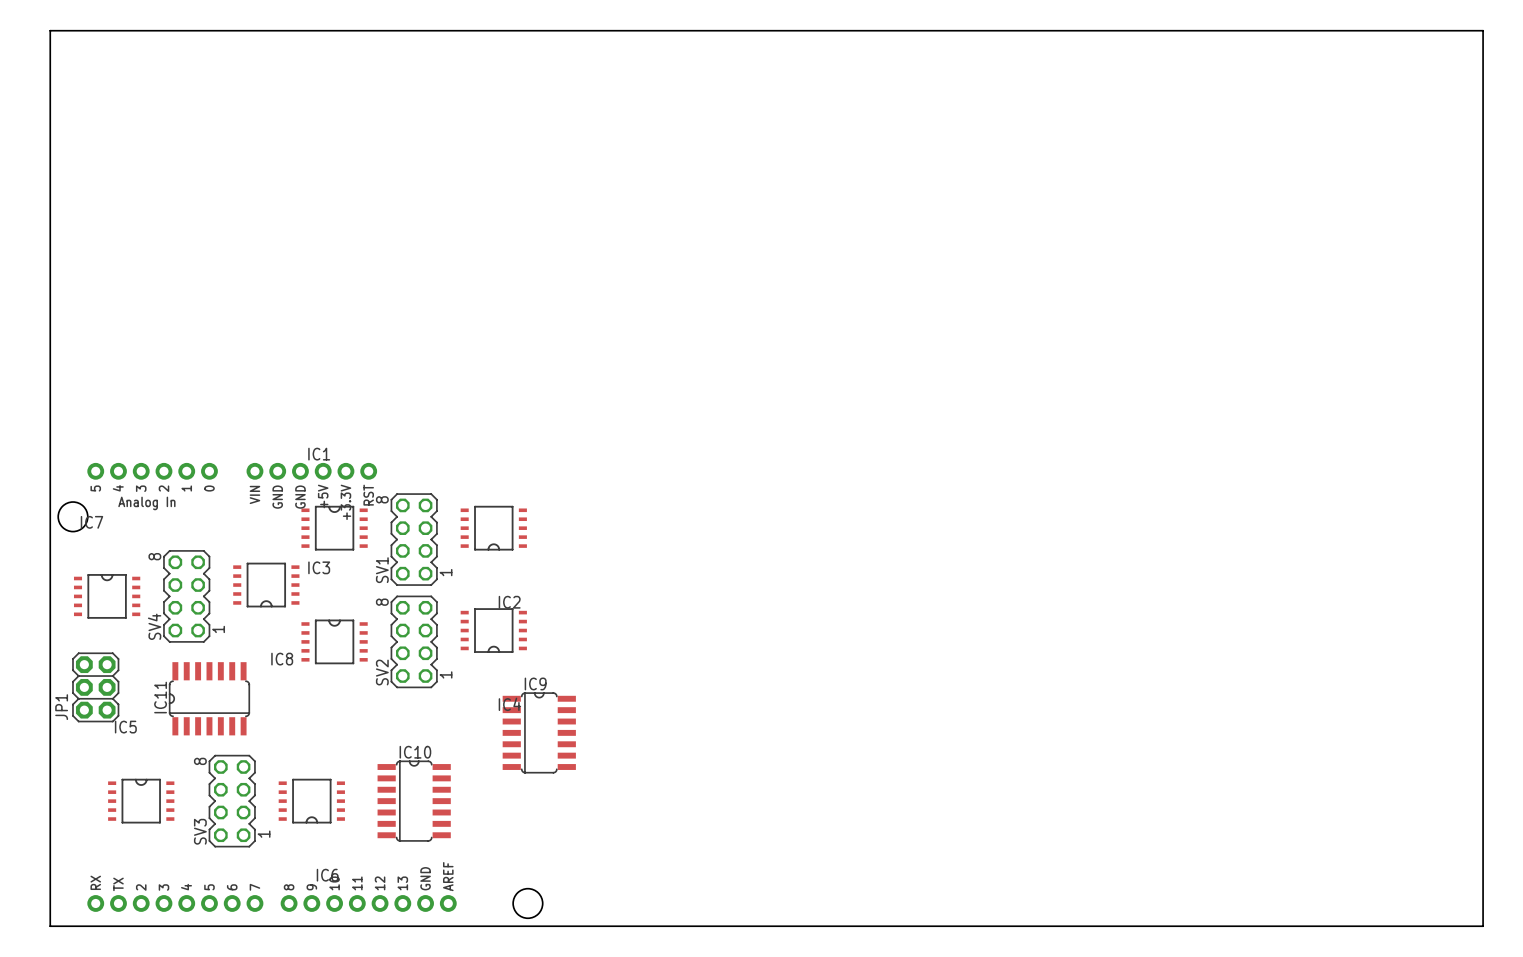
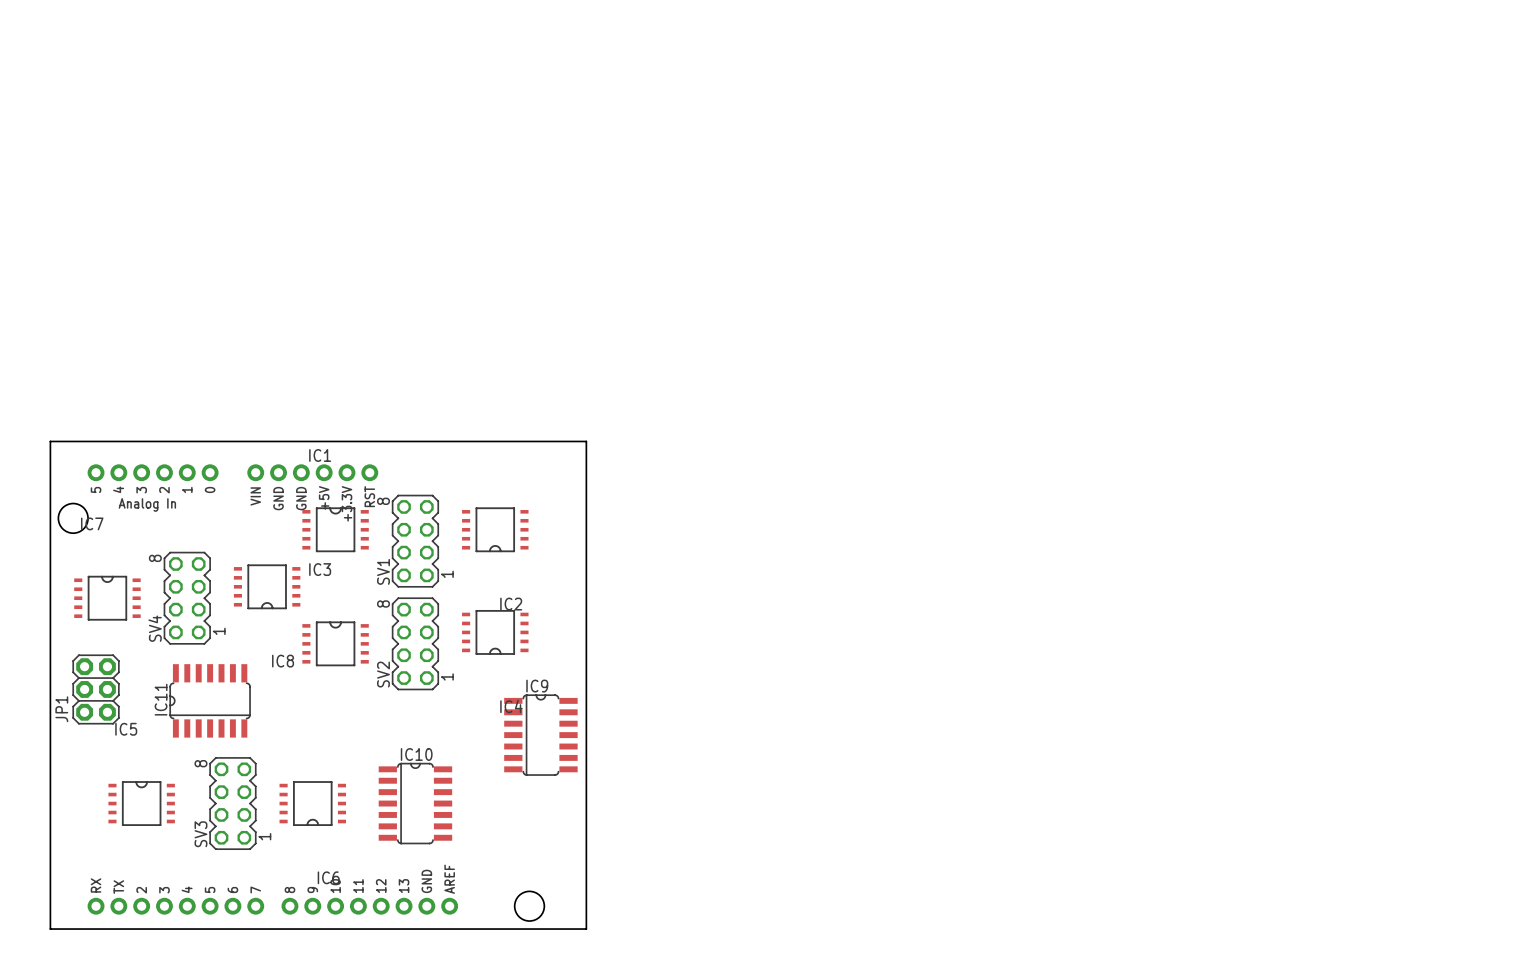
board edge: (50, 440) (50, 30) (1483, 30) (1483, 926) (584, 926) -> (50, 441) (586, 441) (586, 929)

